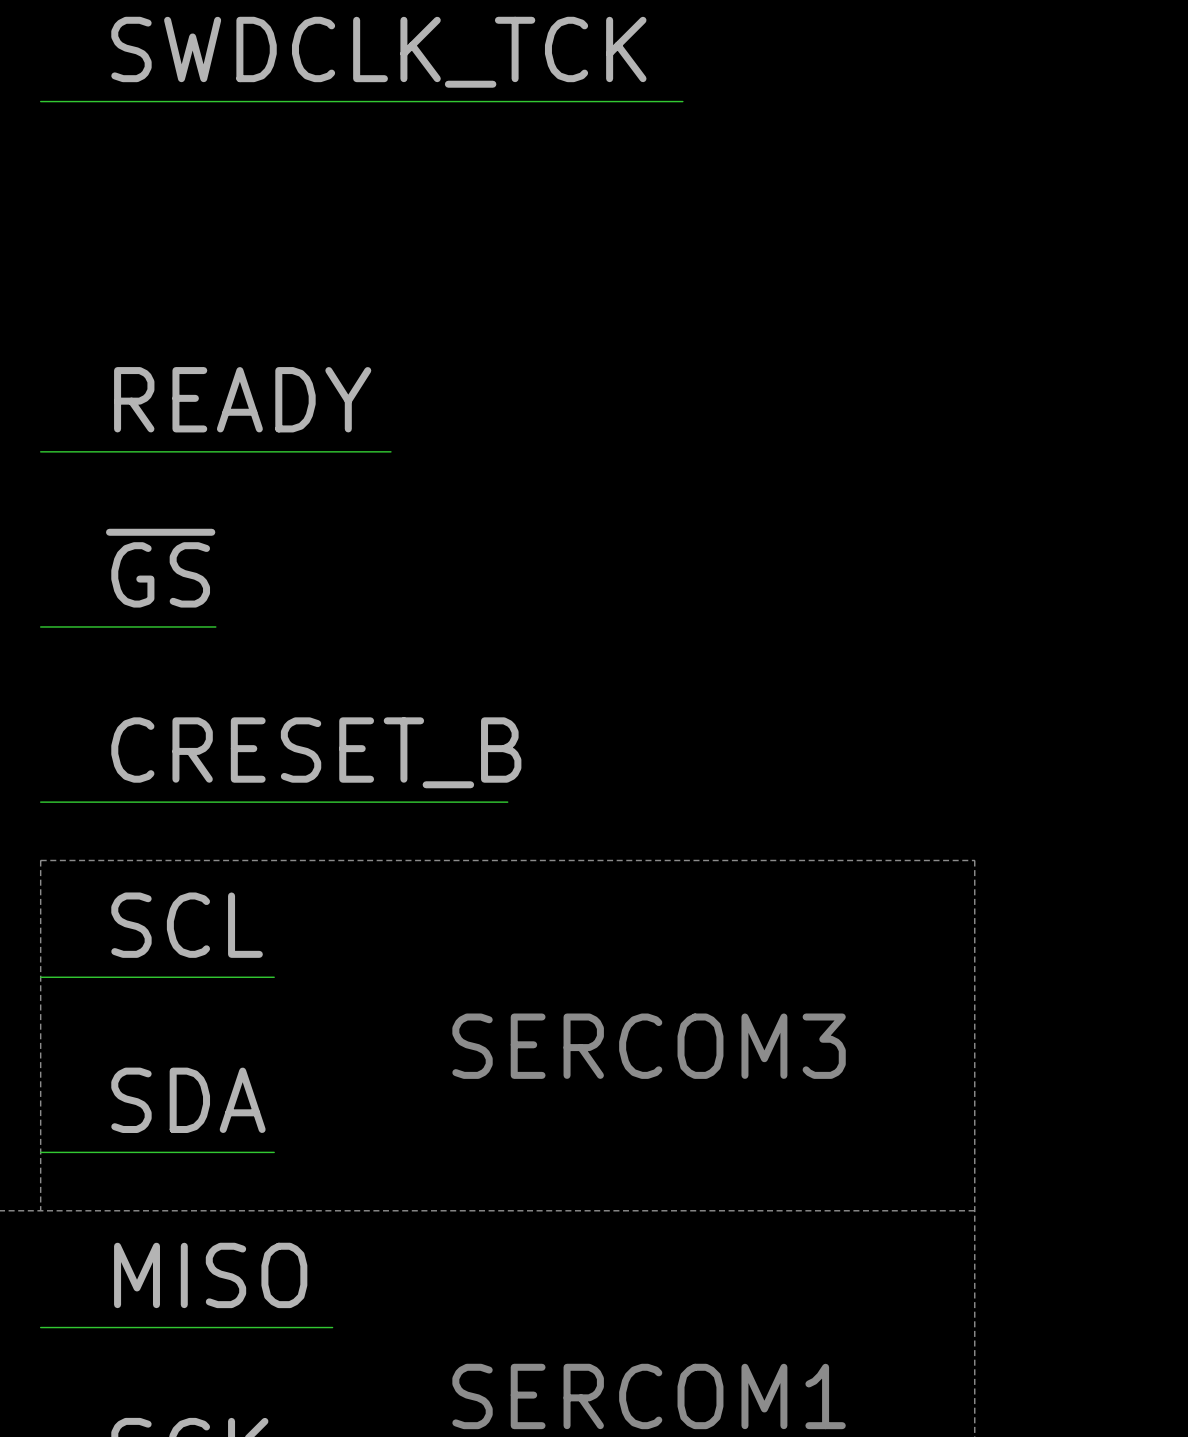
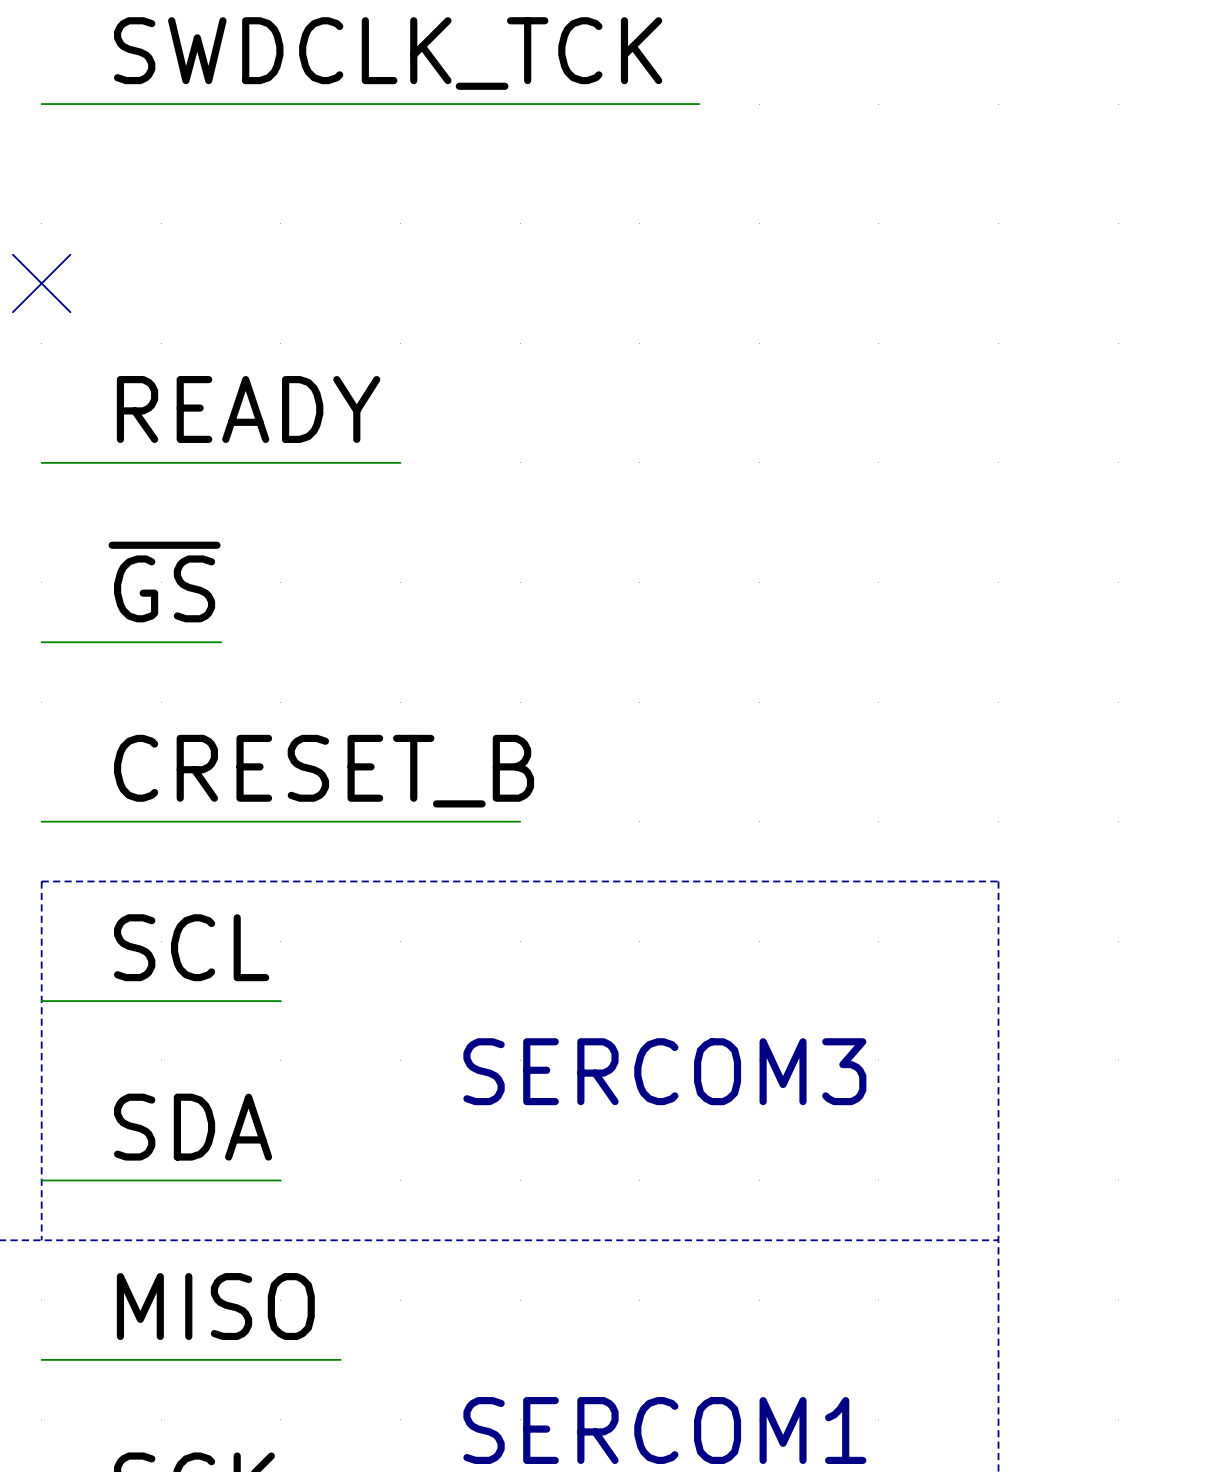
no-connect mark: none -> (41, 283)

